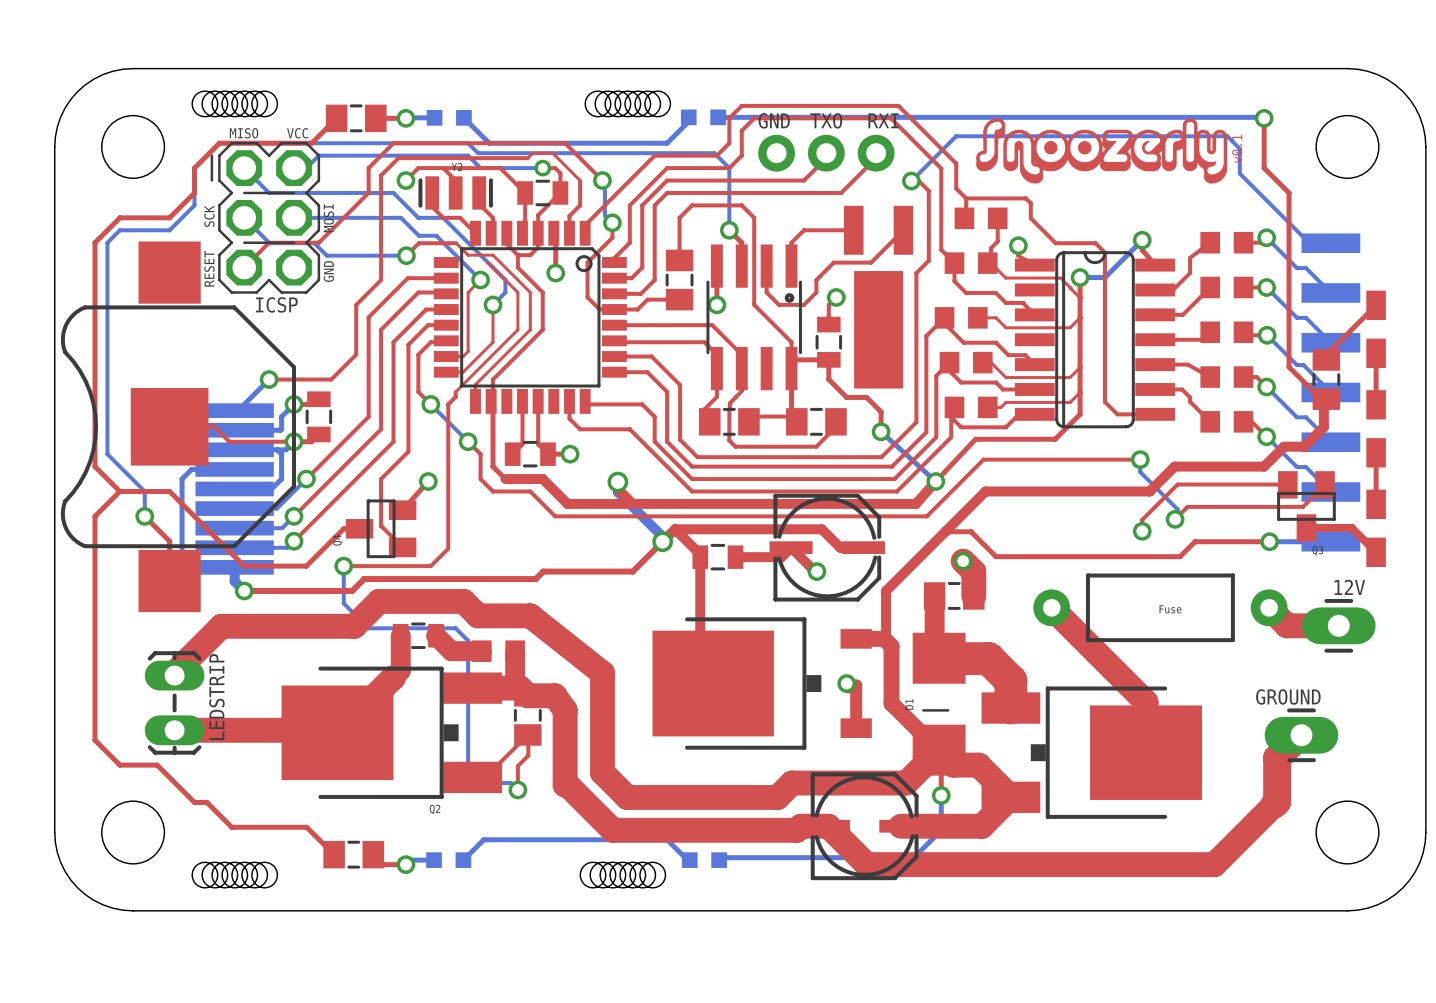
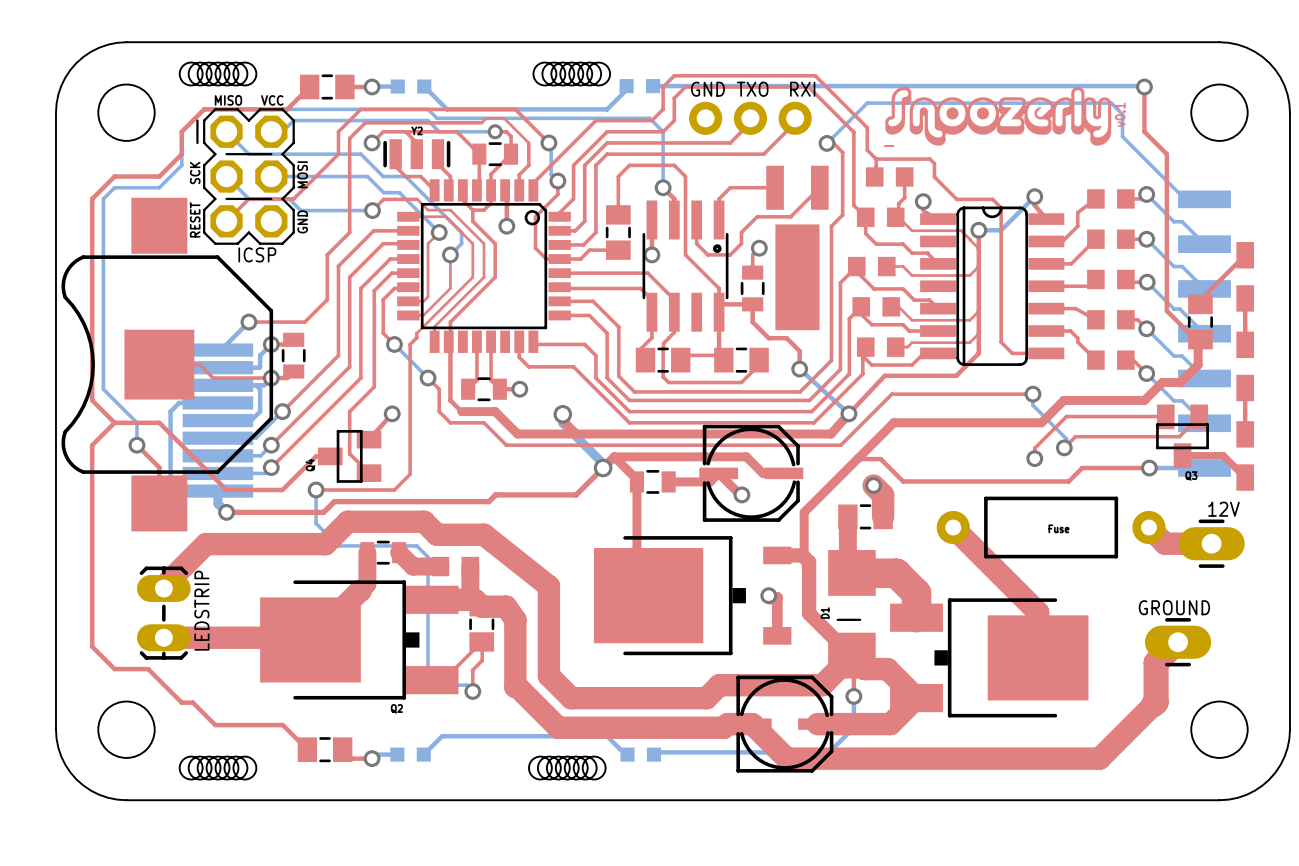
top track: none -> (408, 216) (445, 216)

